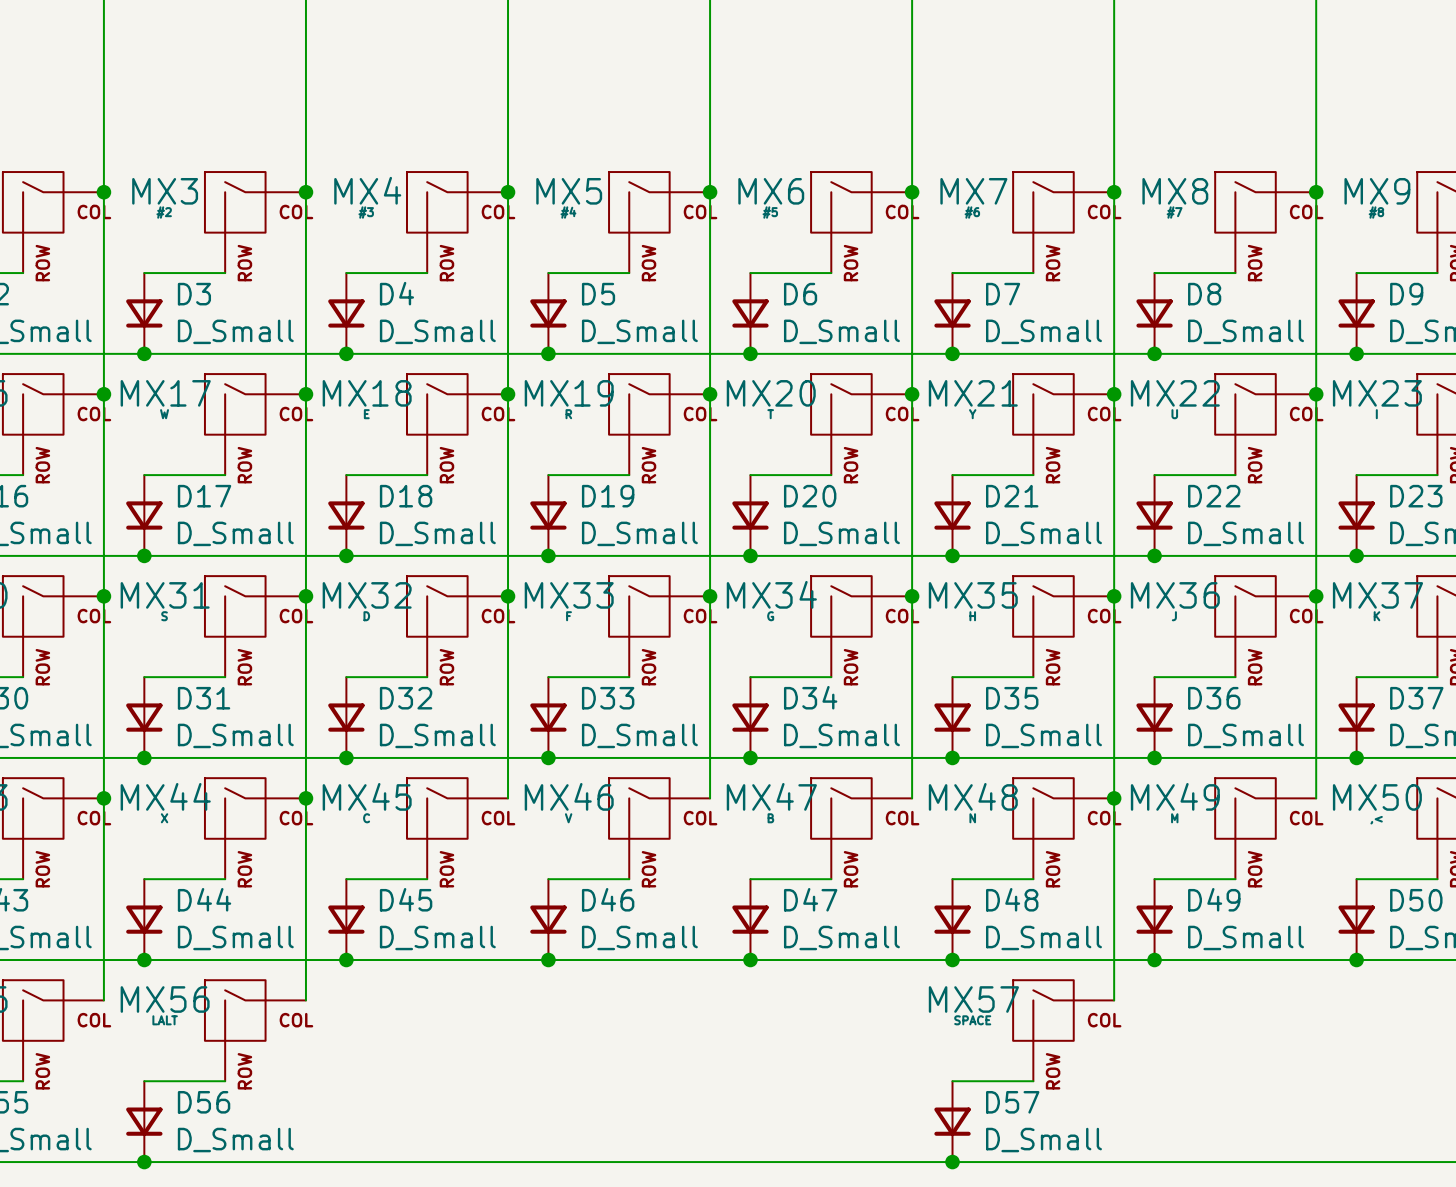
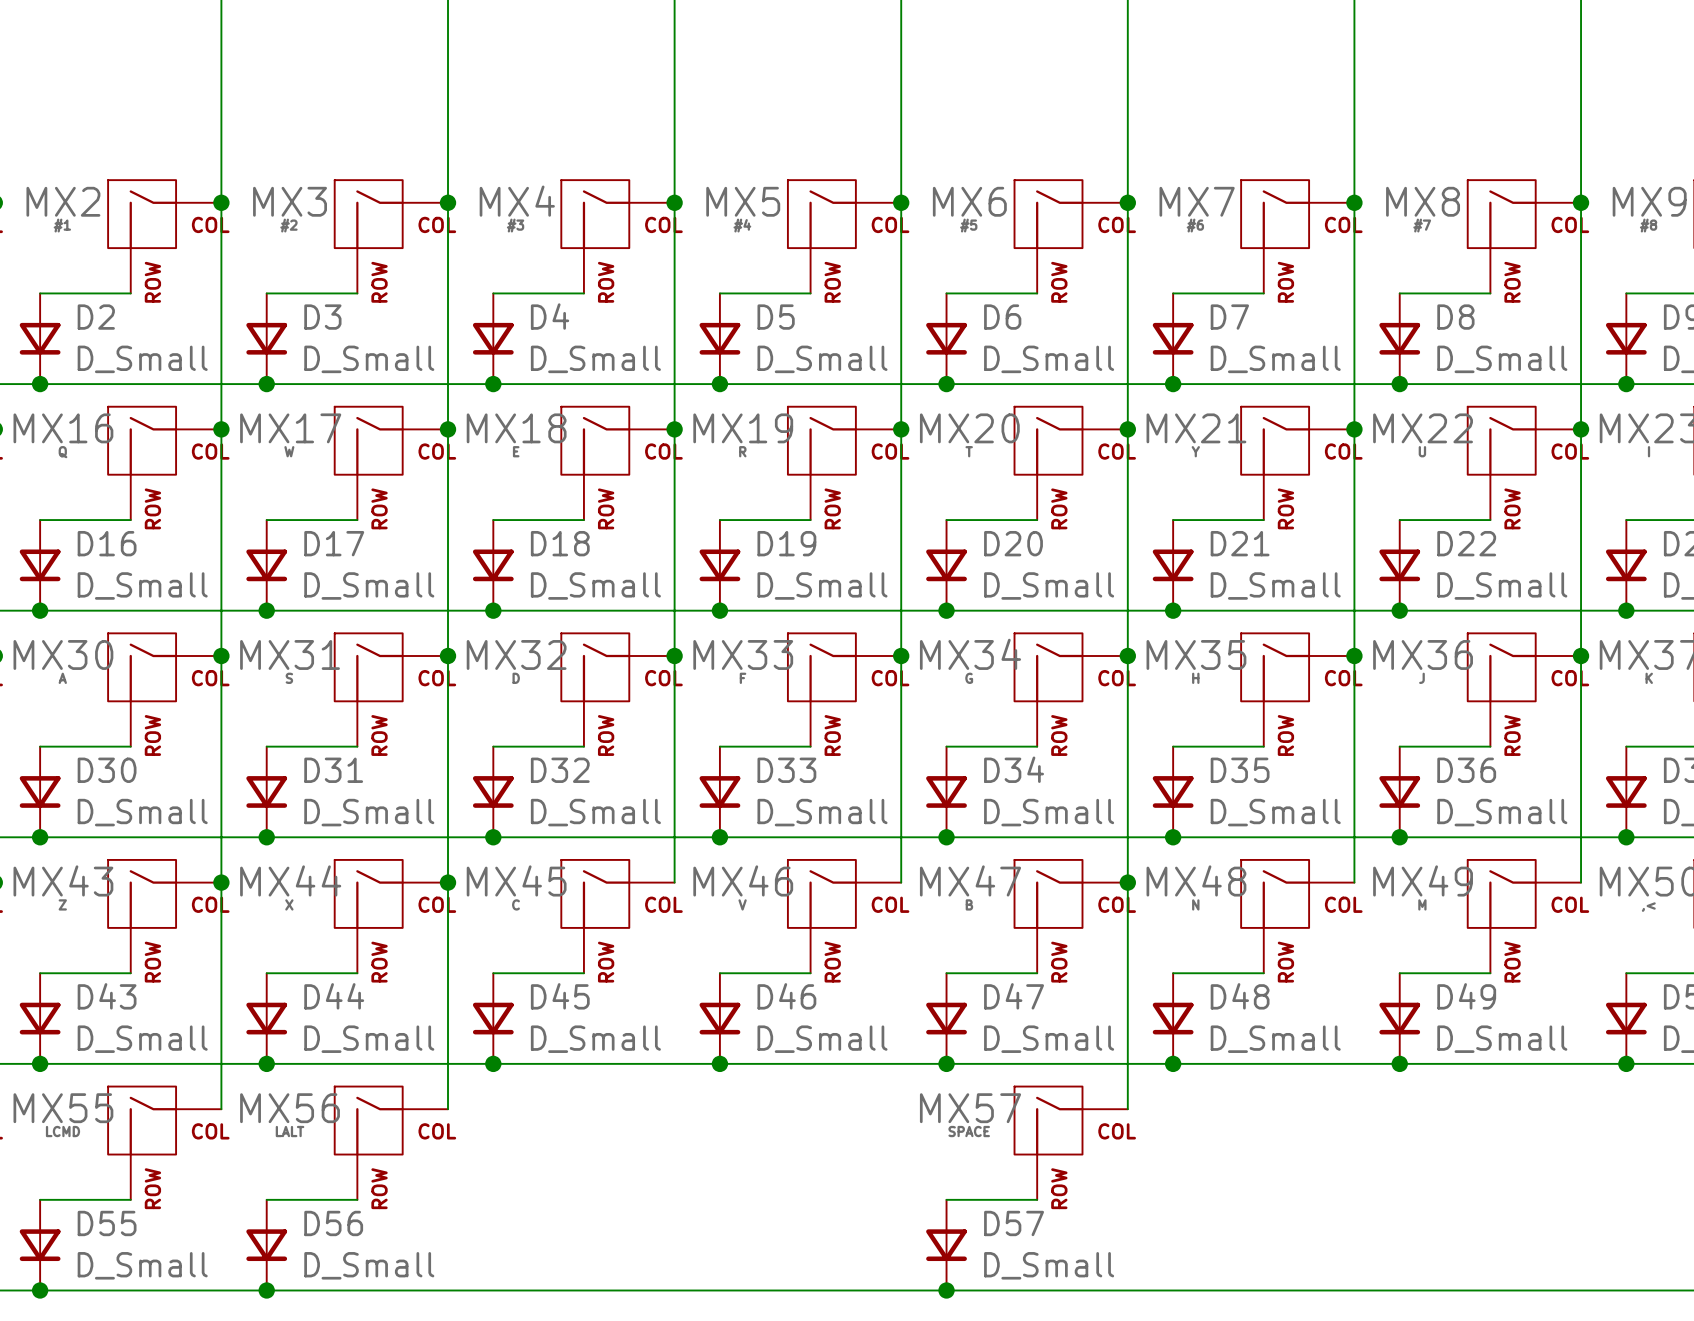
junction: none -> (1127, 882)
wire: (1114, 798) (1114, 1000) -> (1127, 882) (1127, 1109)
junction: (1114, 798) -> none
MX57 position: (1063, 1030) -> (1071, 1143)
wire: (952, 1081) (1033, 1081) -> (946, 1199) (1037, 1199)
D57 position: (952, 1121) -> (946, 1245)
junction: none -> (946, 1290)
junction: (952, 1162) -> none

